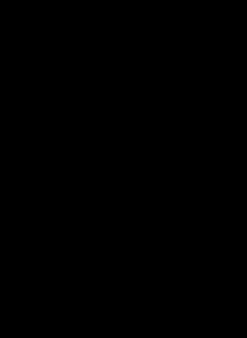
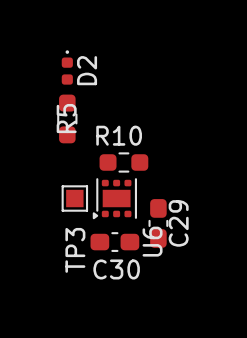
D2: none -> (67, 67)
R5: none -> (67, 118)
R10: none -> (123, 162)
TP3: none -> (74, 198)
U6: none -> (114, 198)
C29: none -> (158, 223)
C30: none -> (114, 242)

